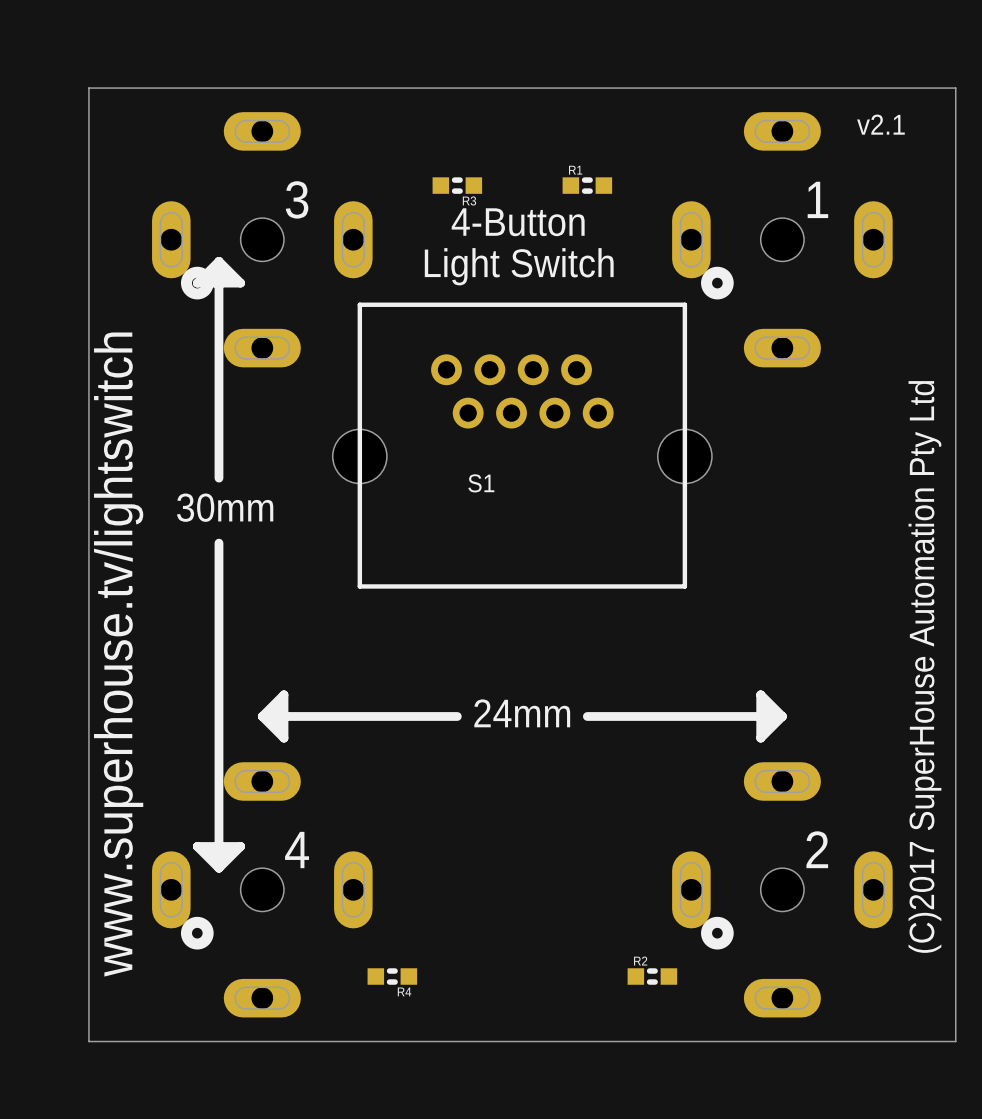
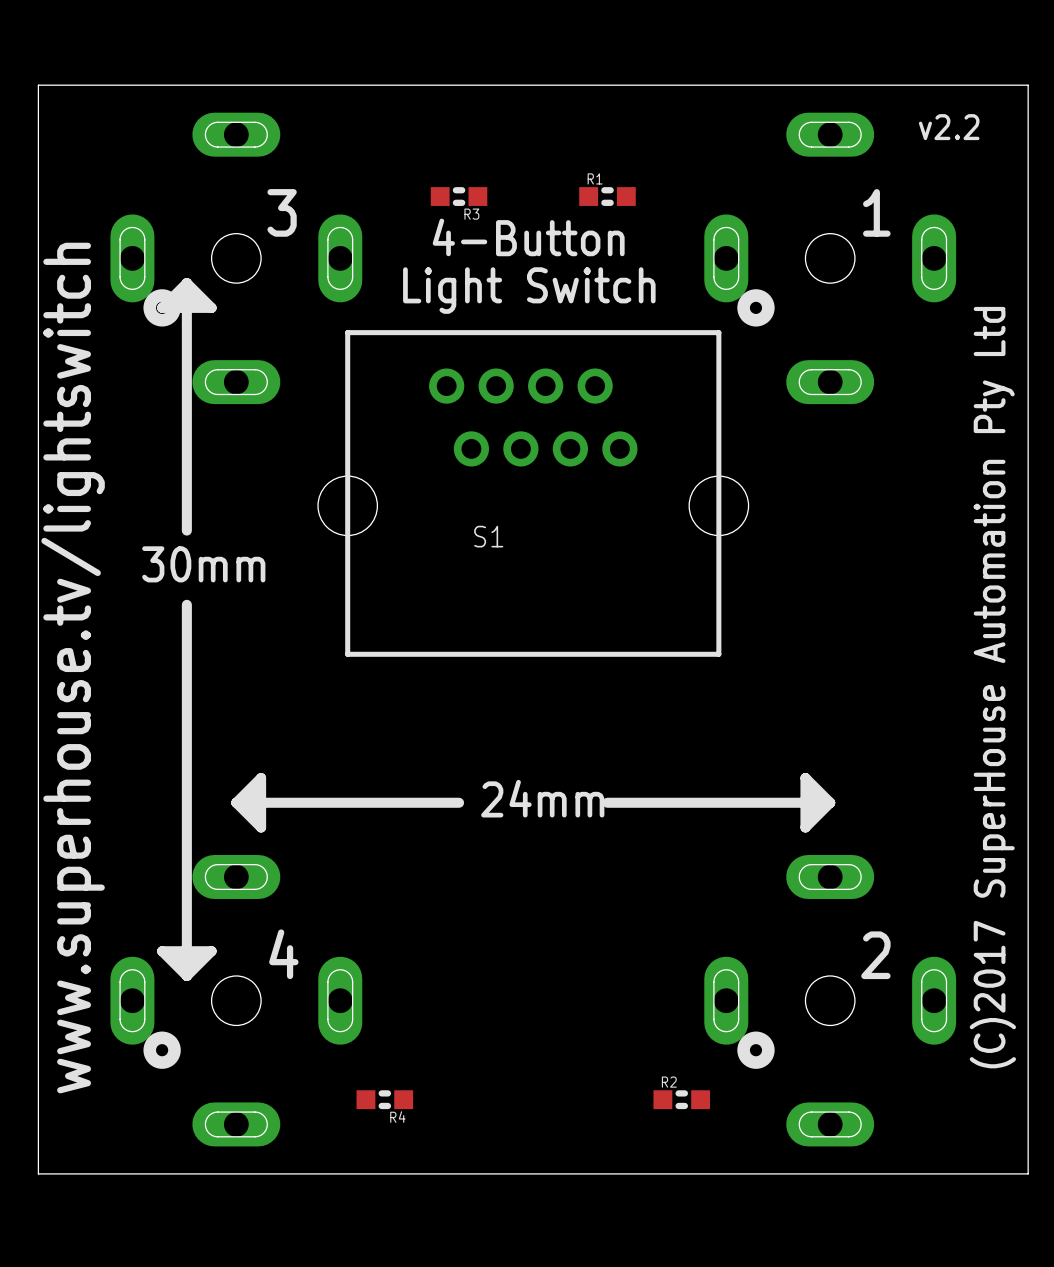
text: v2.1 (880, 124) -> v2.2 (949, 127)
S1 footprint: [332, 302, 712, 589] -> [318, 330, 749, 657]

